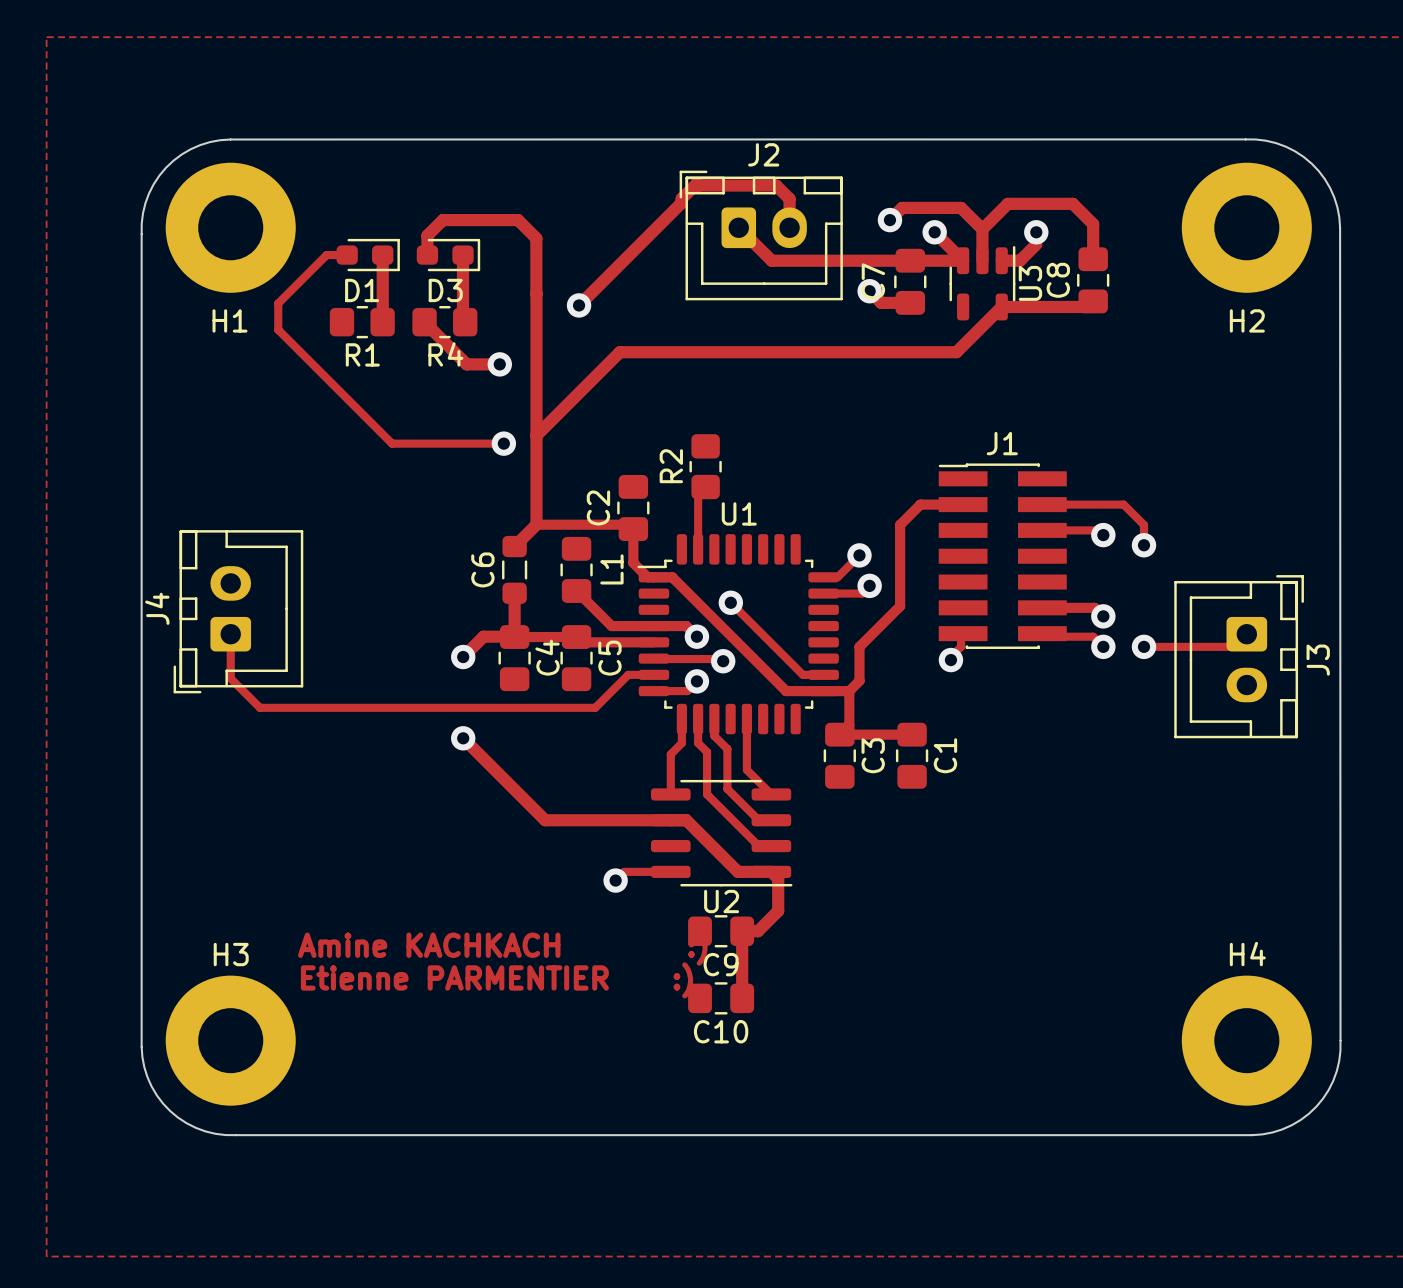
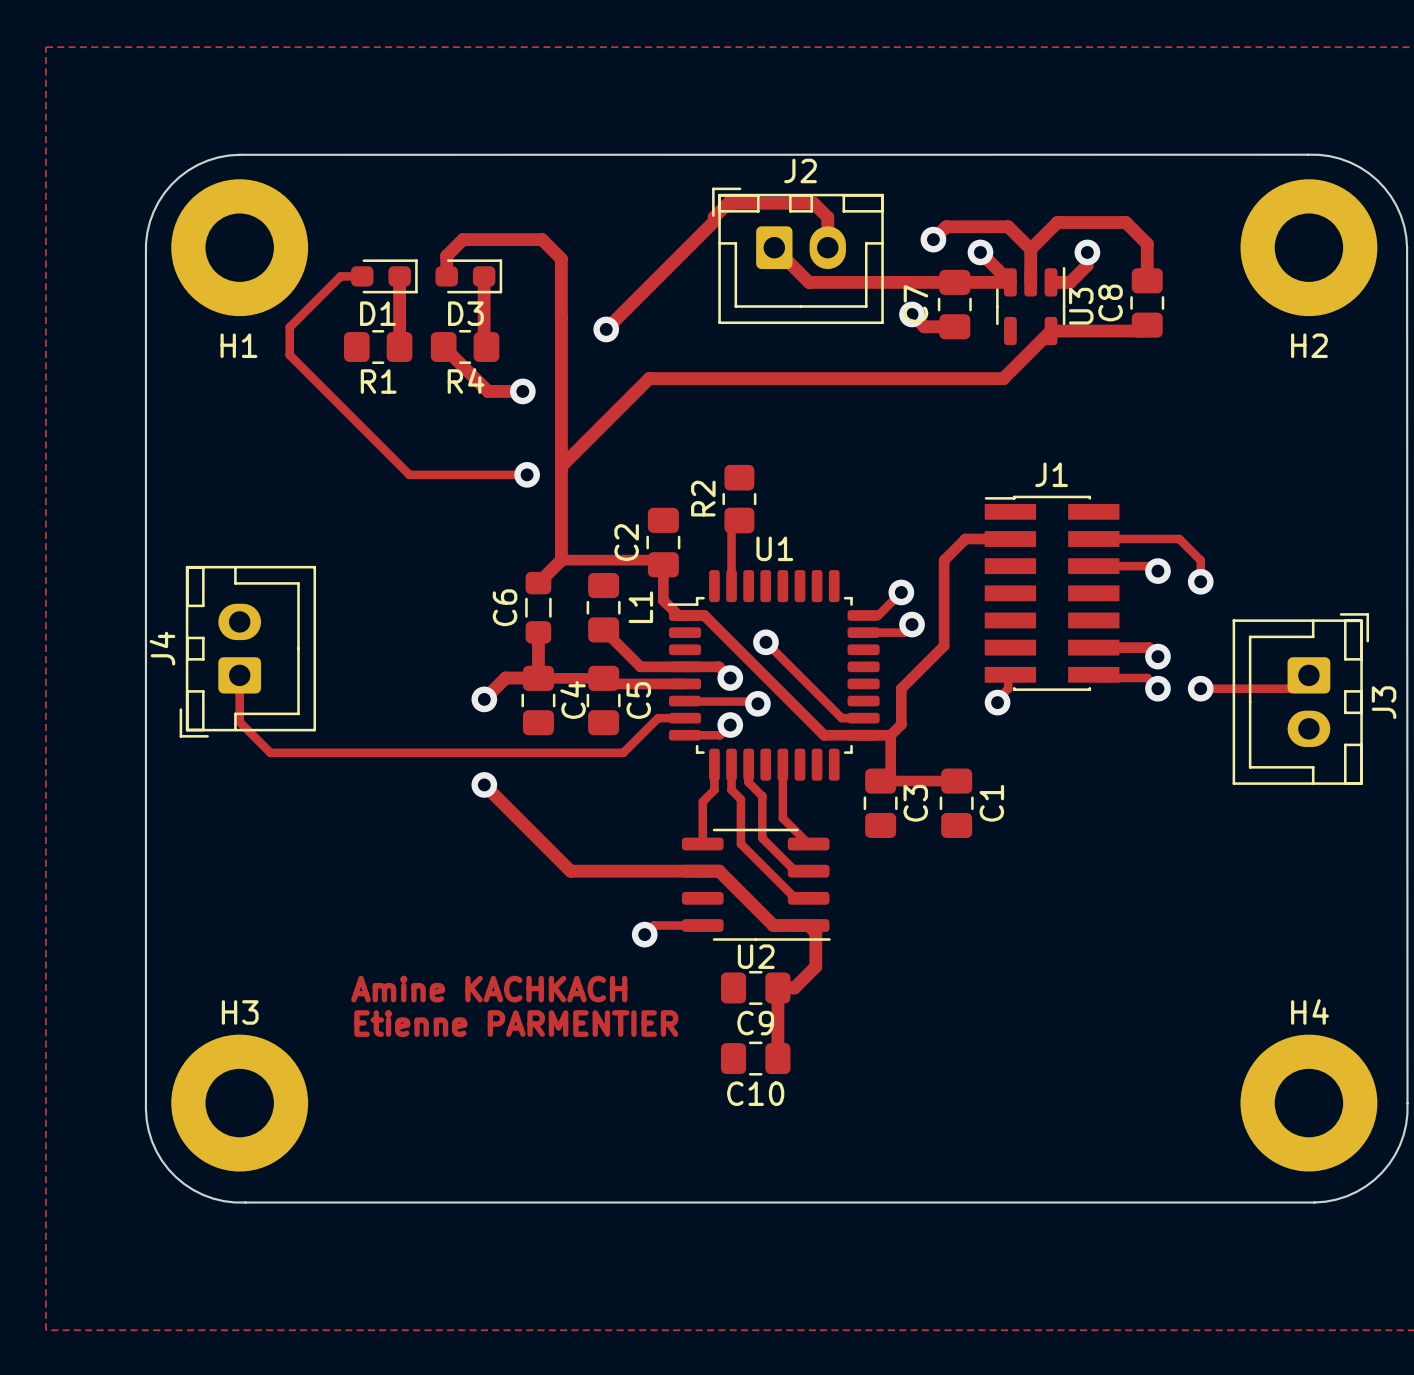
text: Amine KACHKACH :) (502, 947) -> Amine KACHKACH (489, 989)
text: Etienne PARMENTIER :) (496, 980) -> Etienne PARMENTIER (516, 1023)

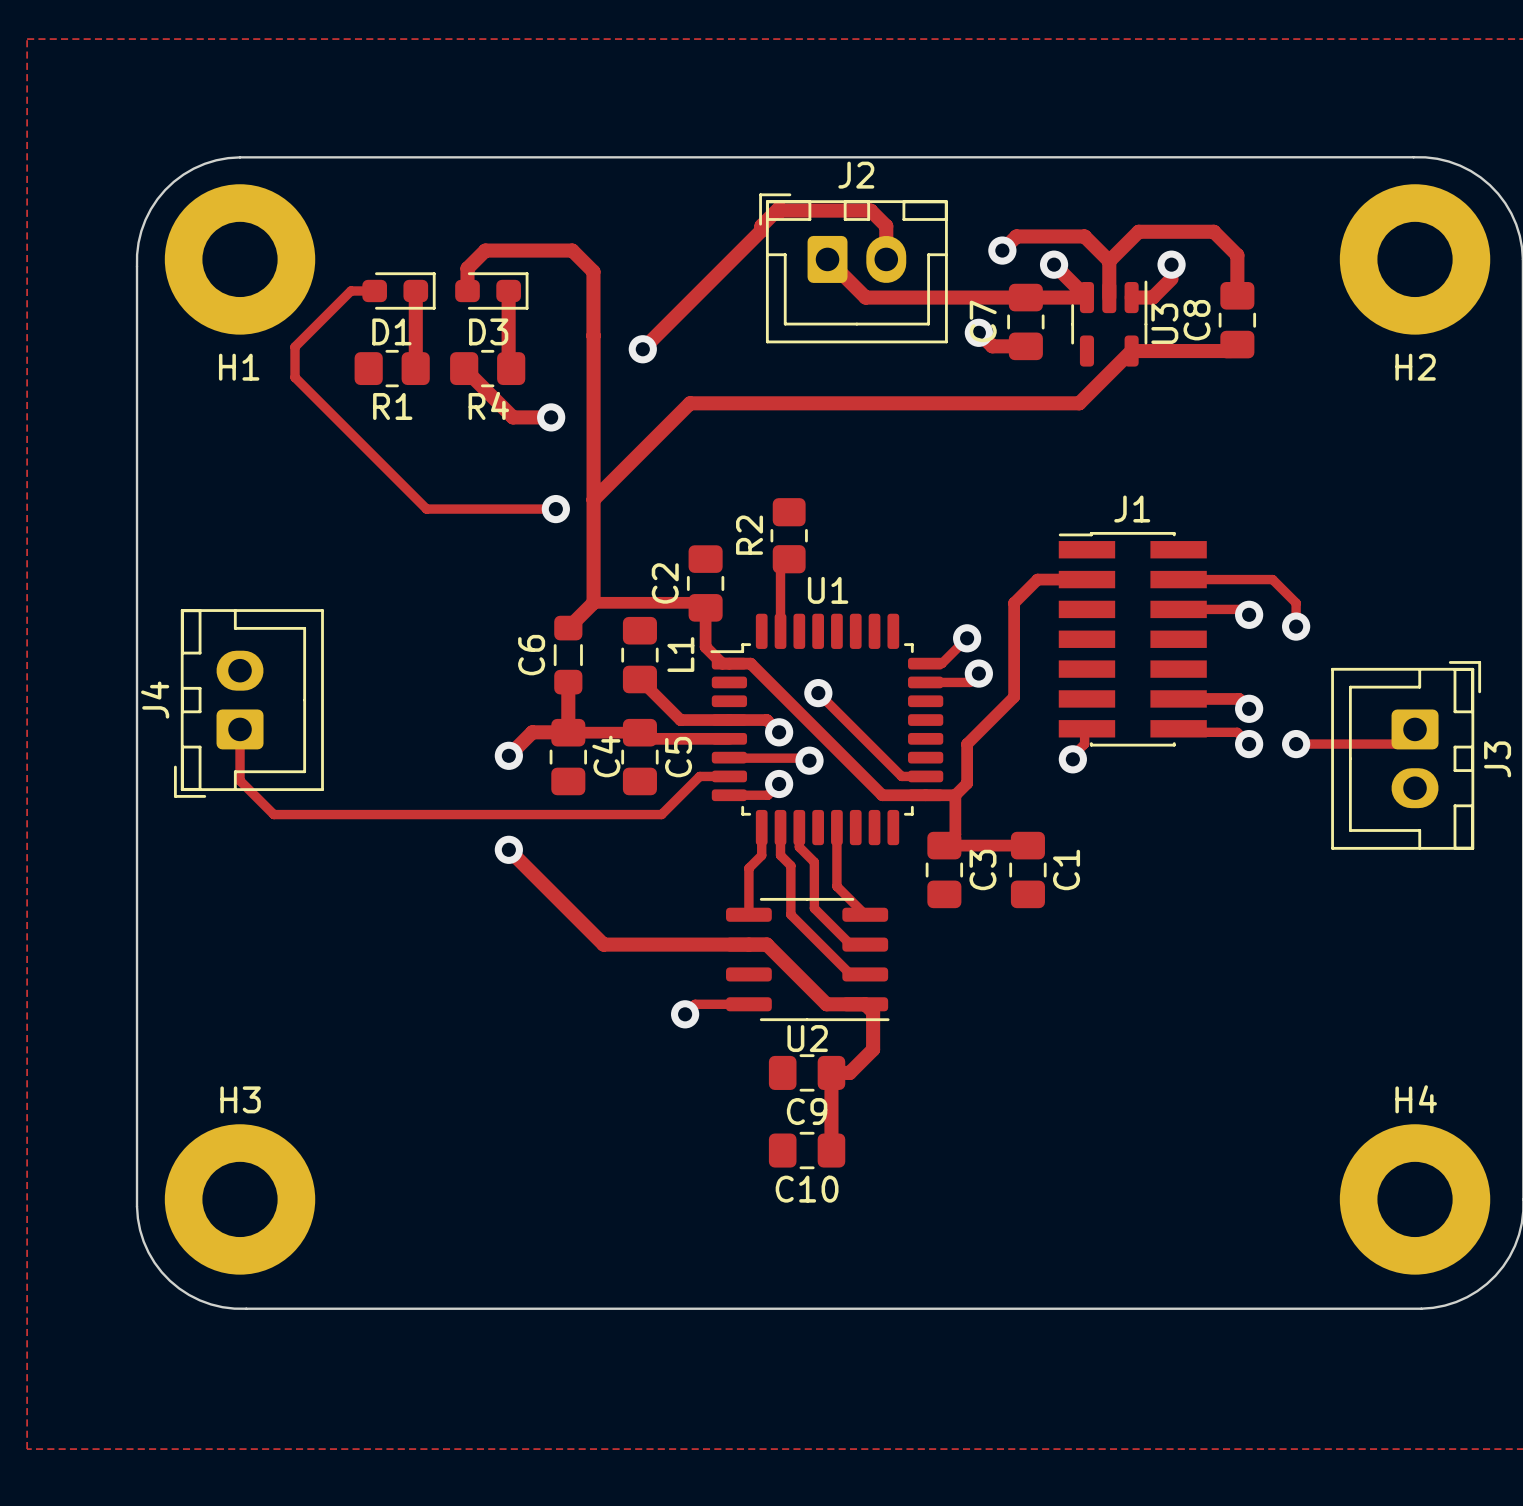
text: Amine KACHKACH (489, 989) -> none
text: Etienne PARMENTIER (516, 1023) -> none

